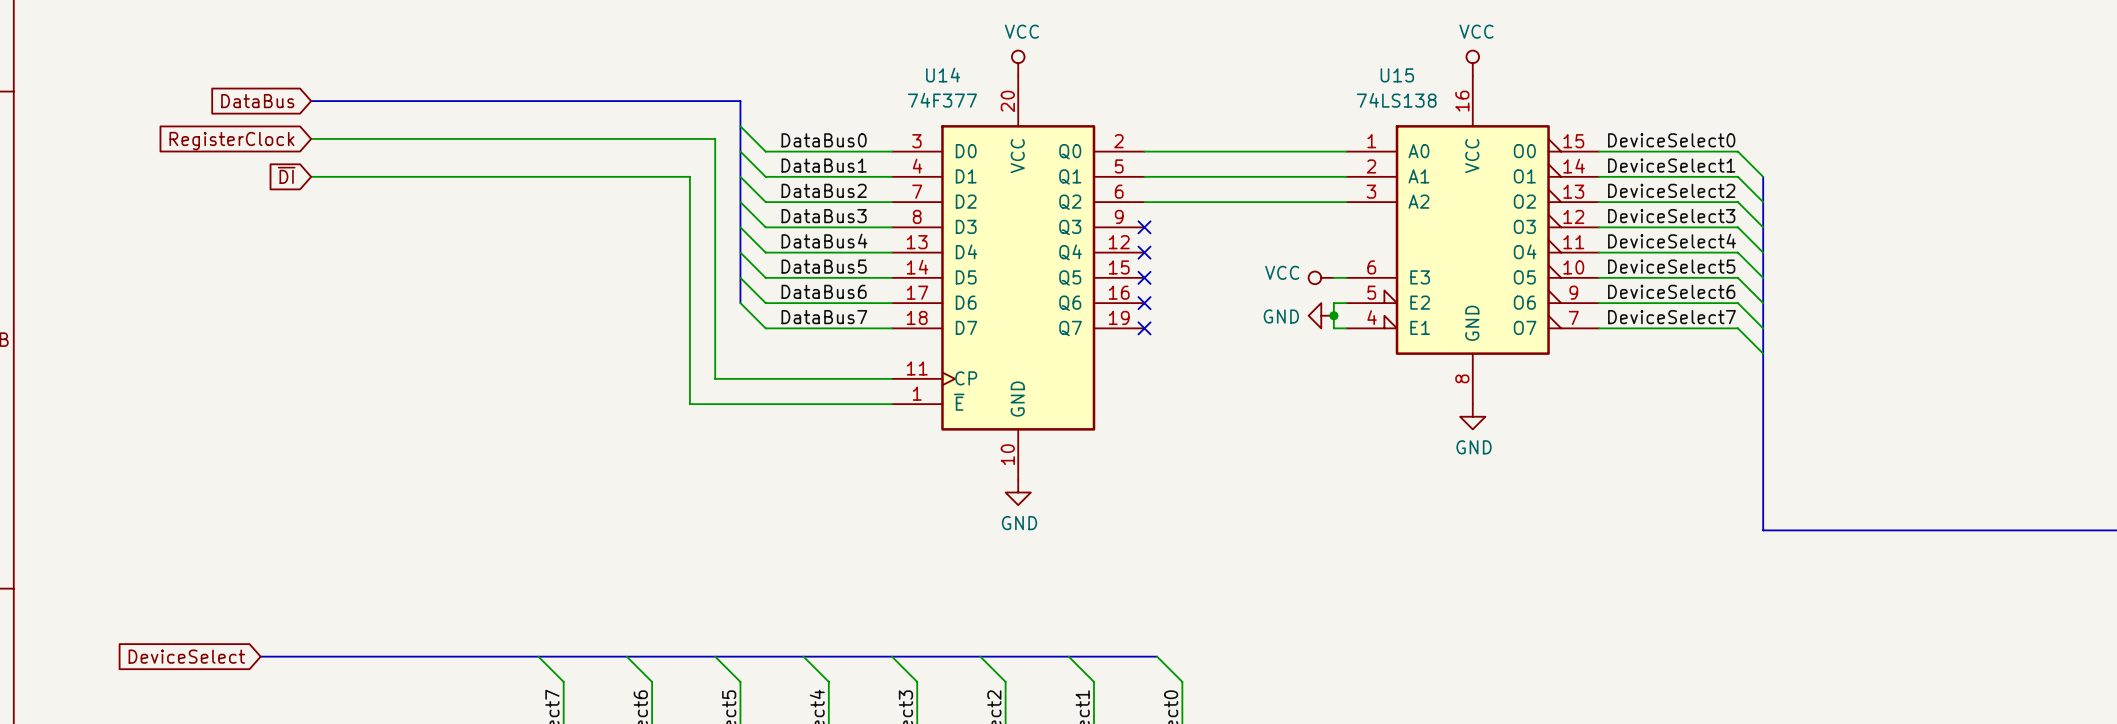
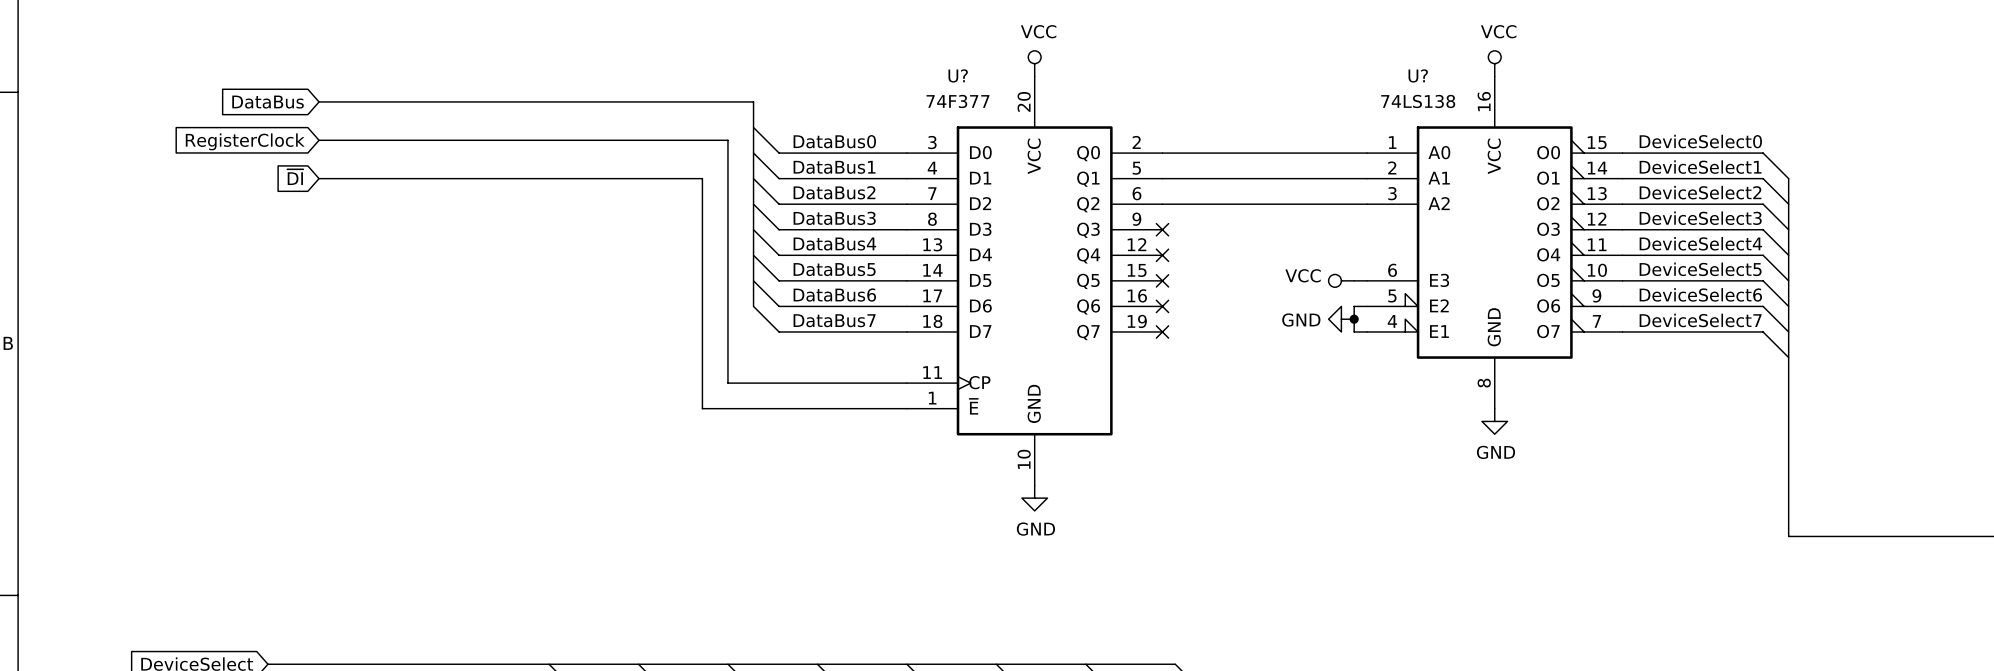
U14 name: U14 (943, 75) -> U? (958, 75)
U15 name: U15 (1397, 75) -> U? (1418, 75)

